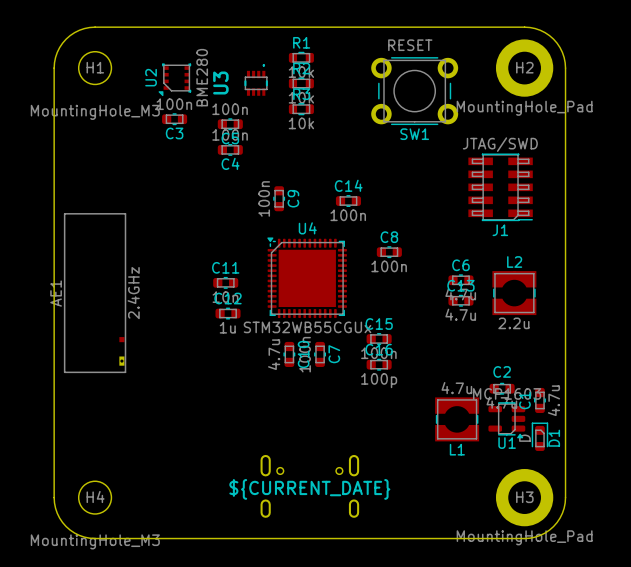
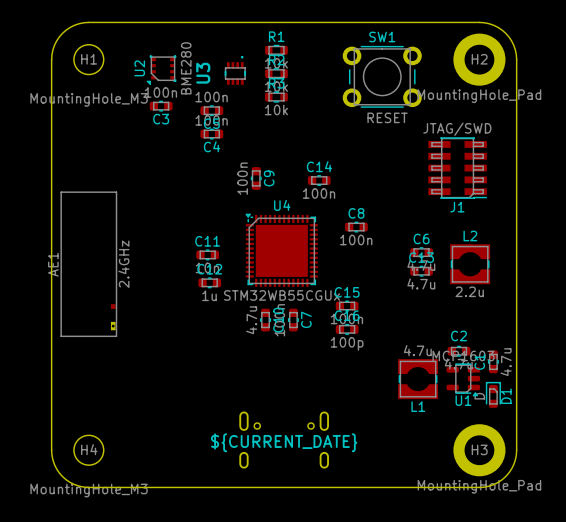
SW1 rotation: 0° (414, 91) -> 180° (382, 76)

